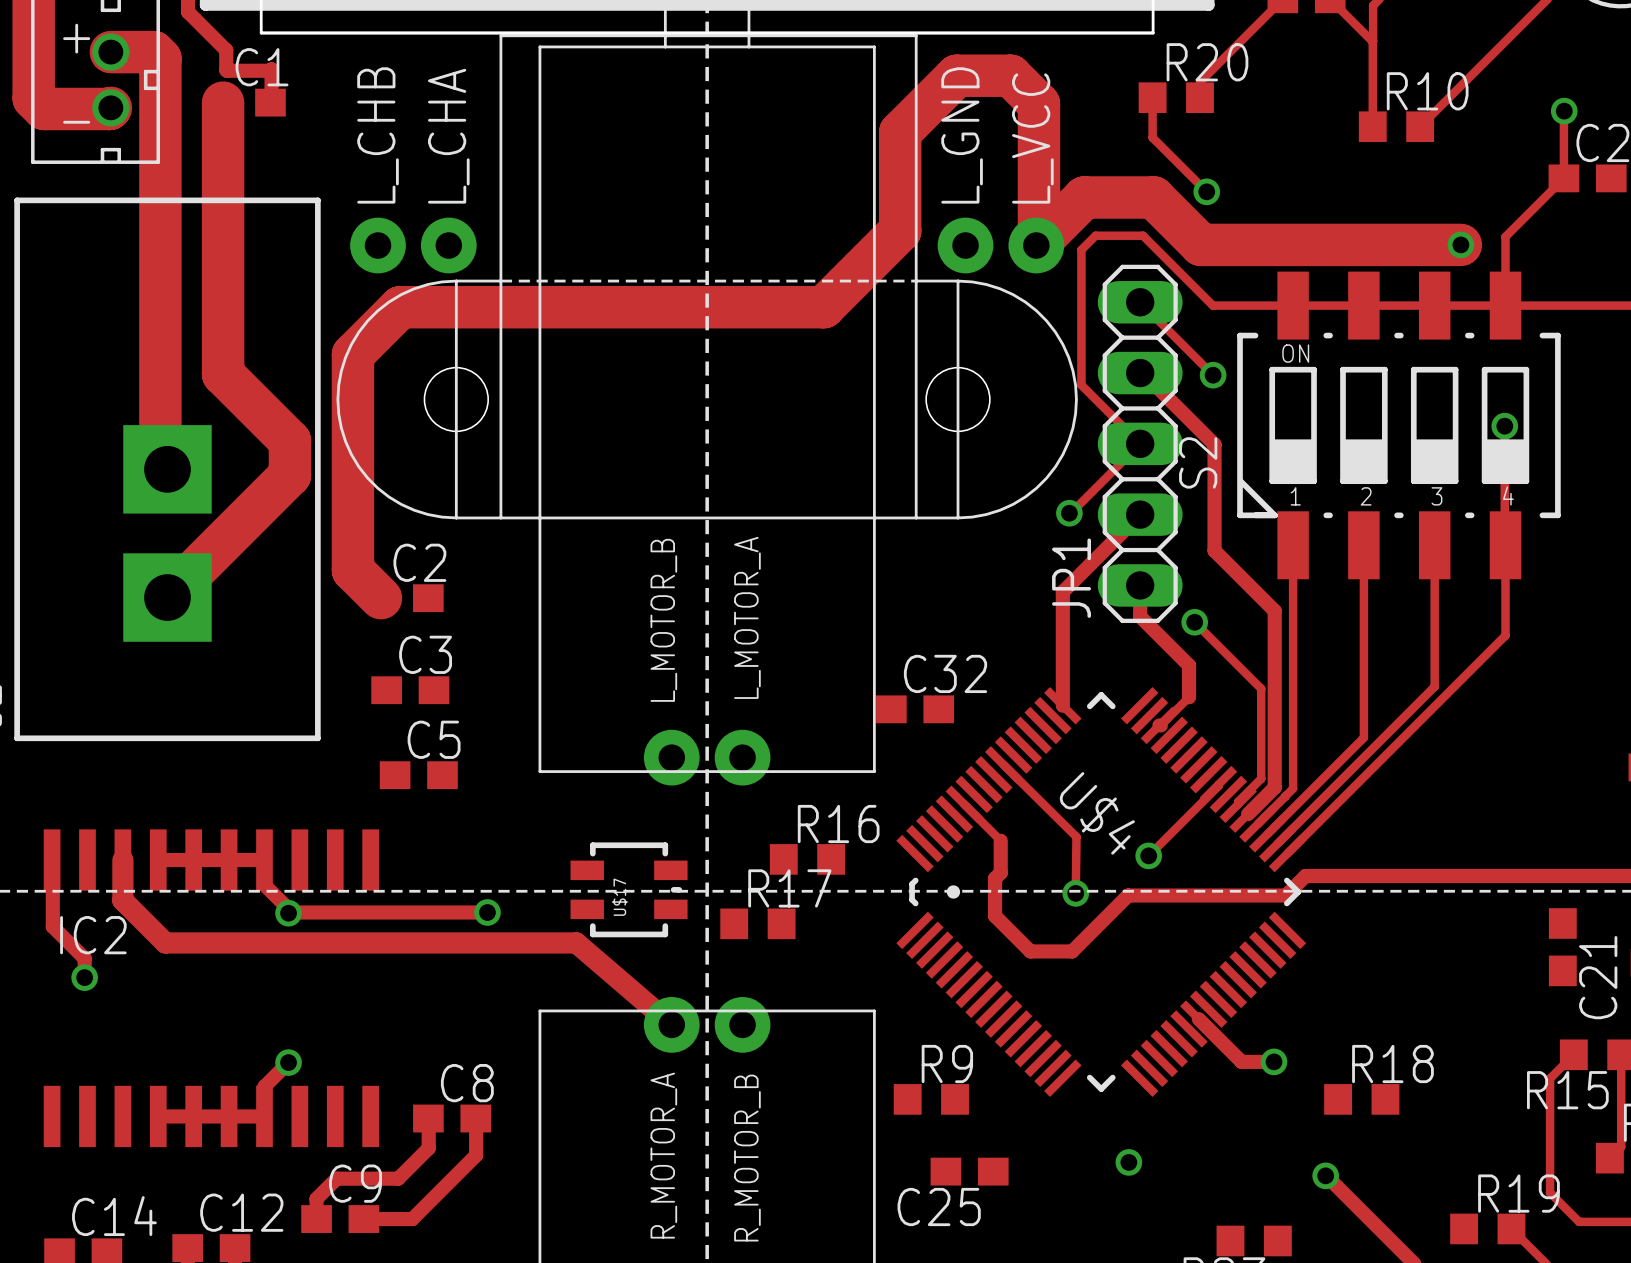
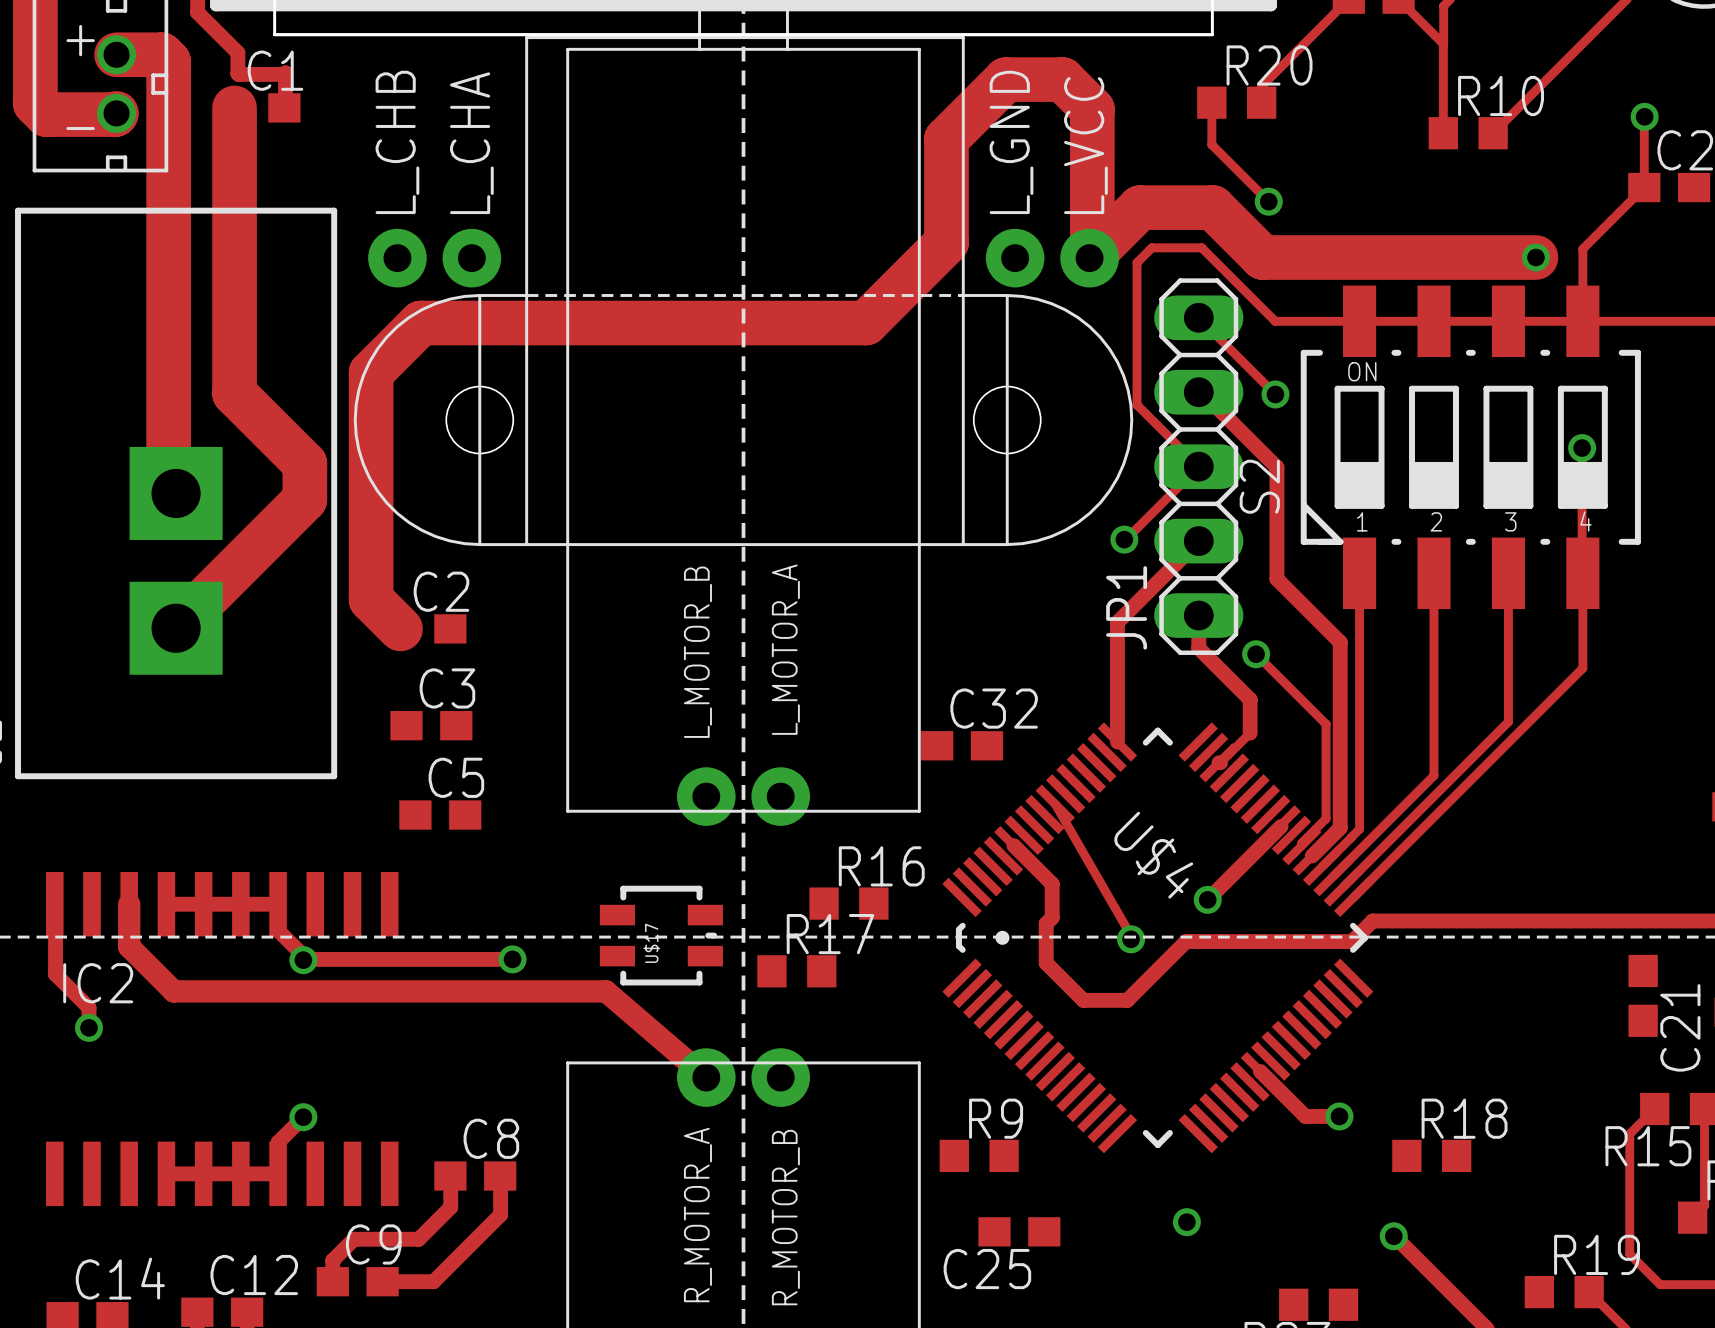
track: (1003, 764) (1076, 836) (1075, 893) -> (1055, 804) (1131, 935) (1131, 939)
track width: thin (1218, 786) (1148, 855) -> thick (1281, 826) (1207, 899)
track width: thin (964, 804) (1000, 840) -> thick (1013, 845) (1052, 883)

